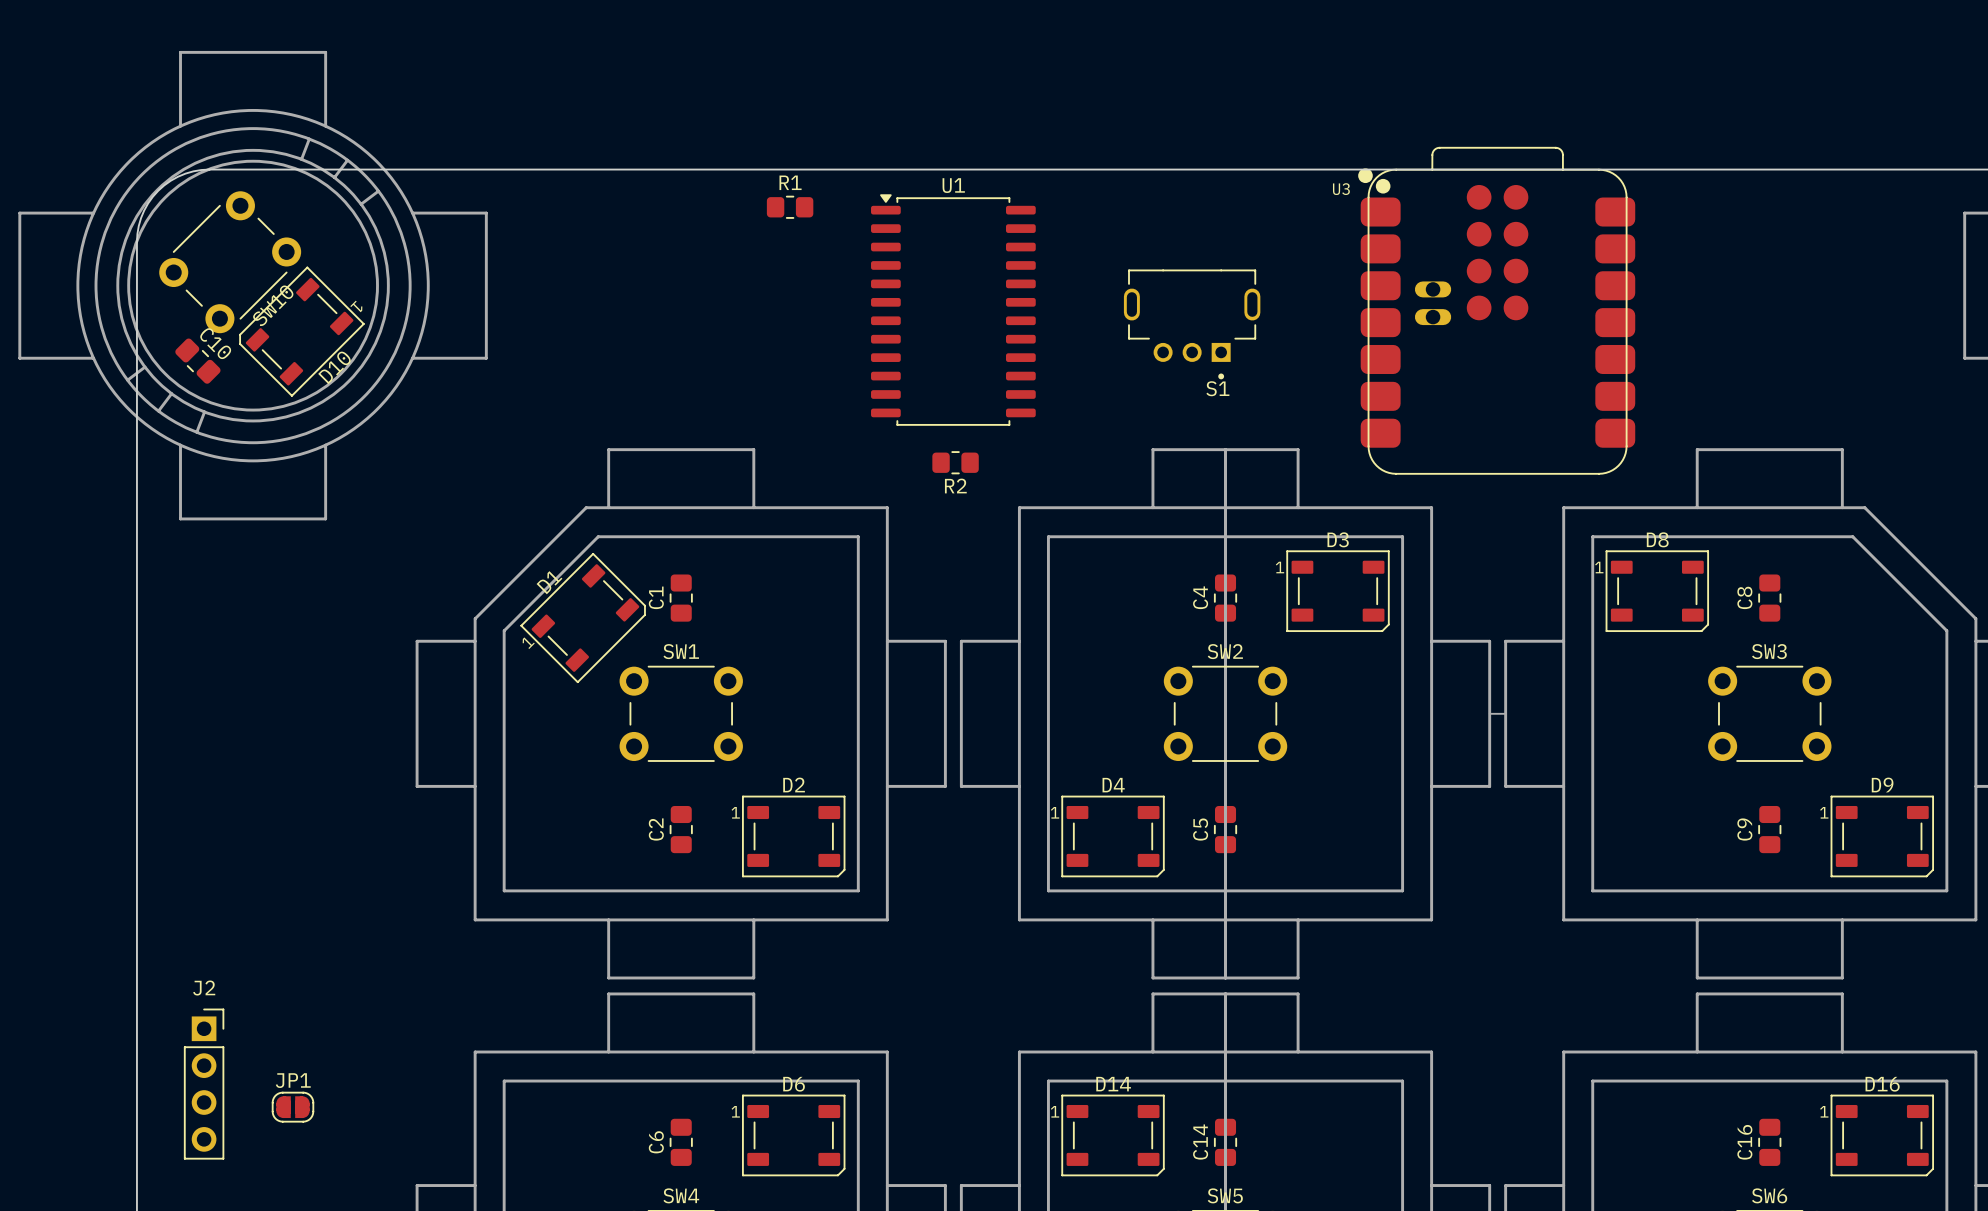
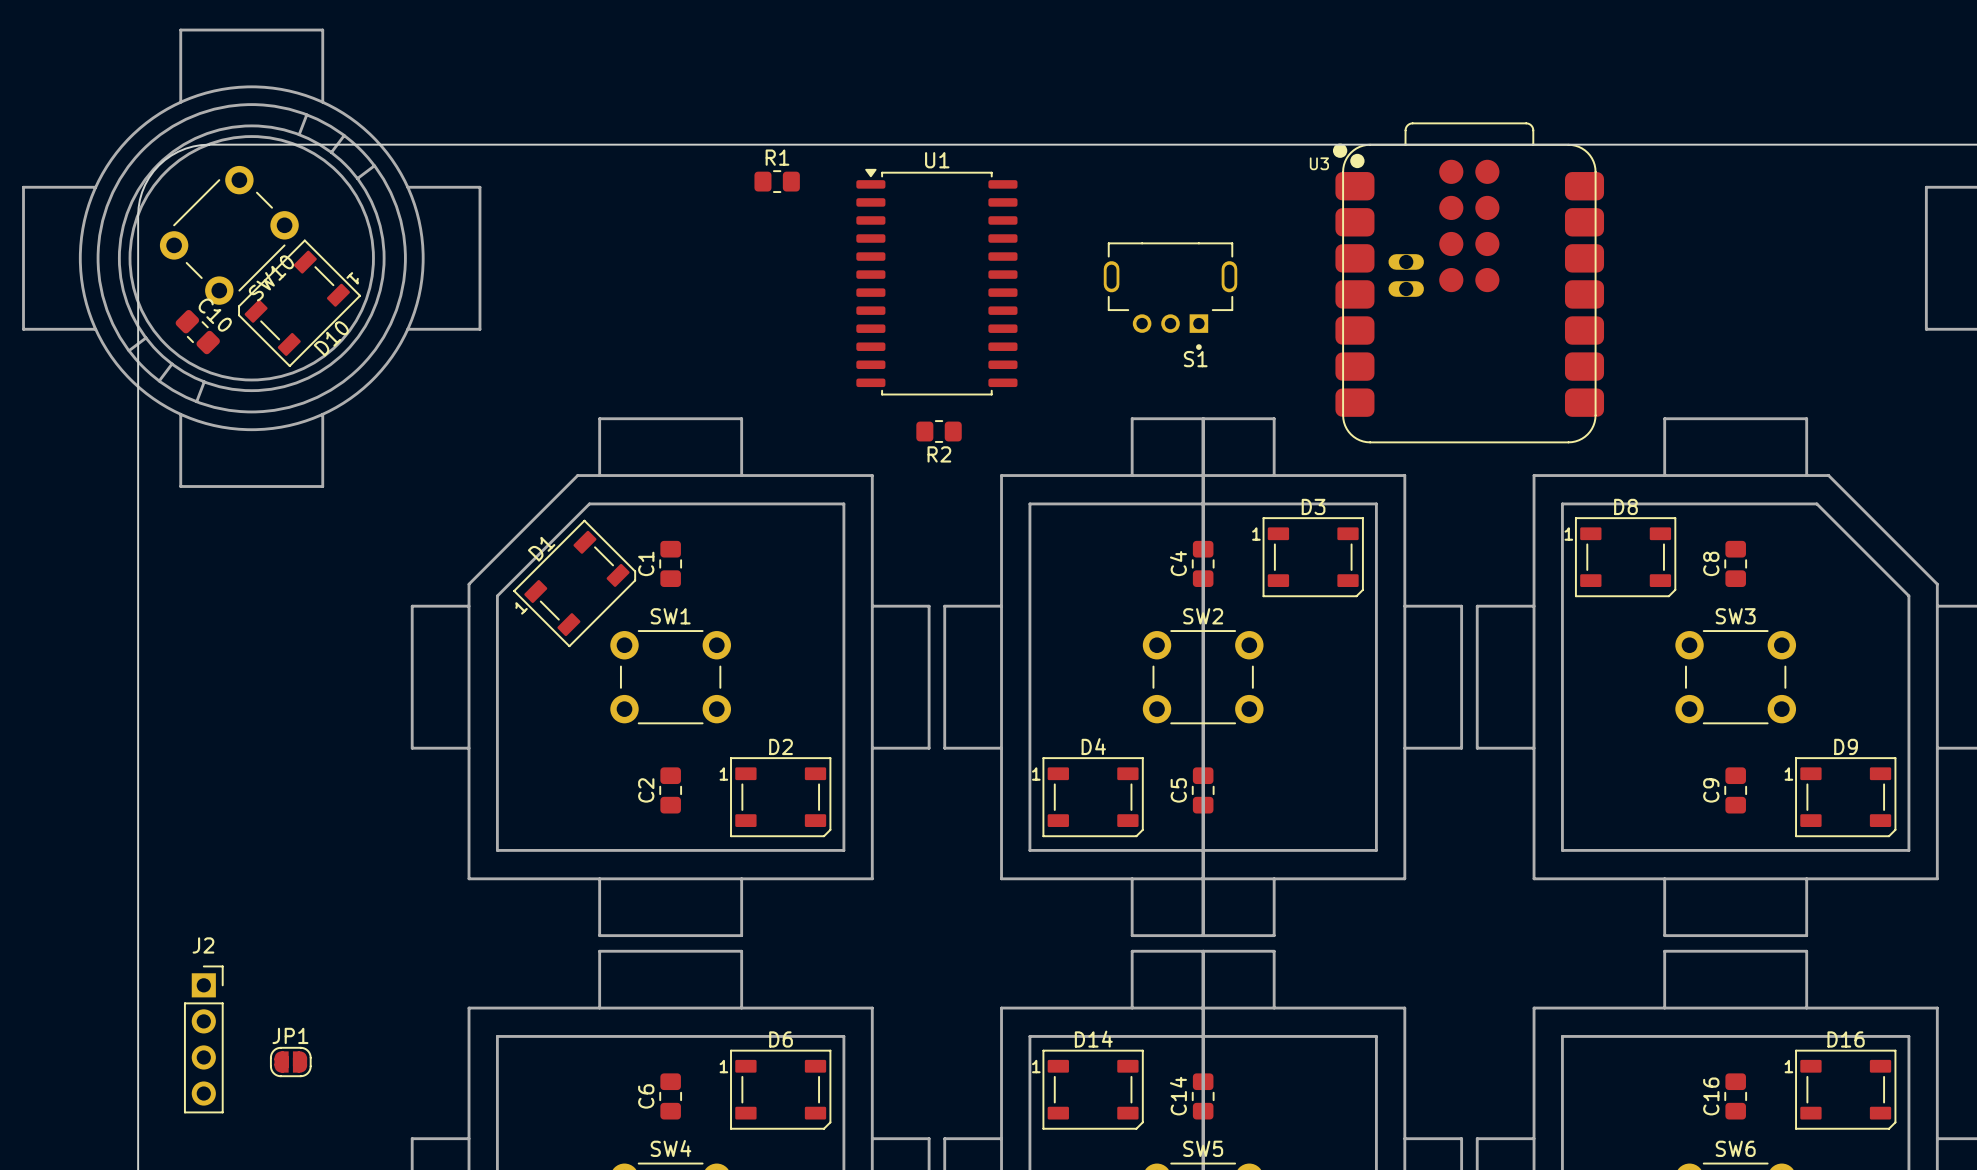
line: (1489, 713) (1505, 713) -> none

